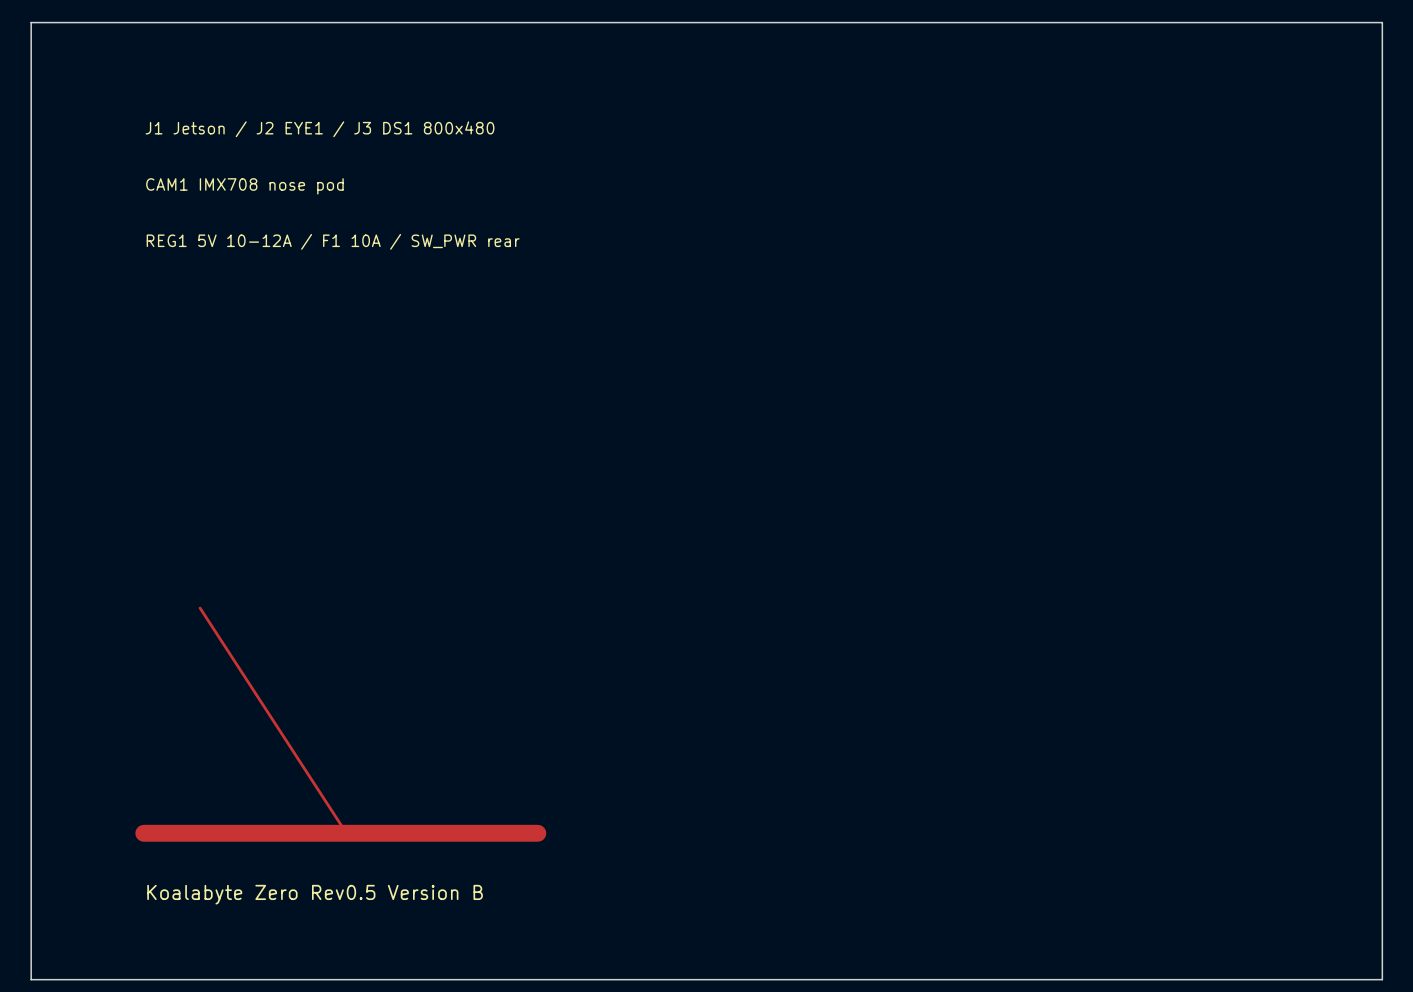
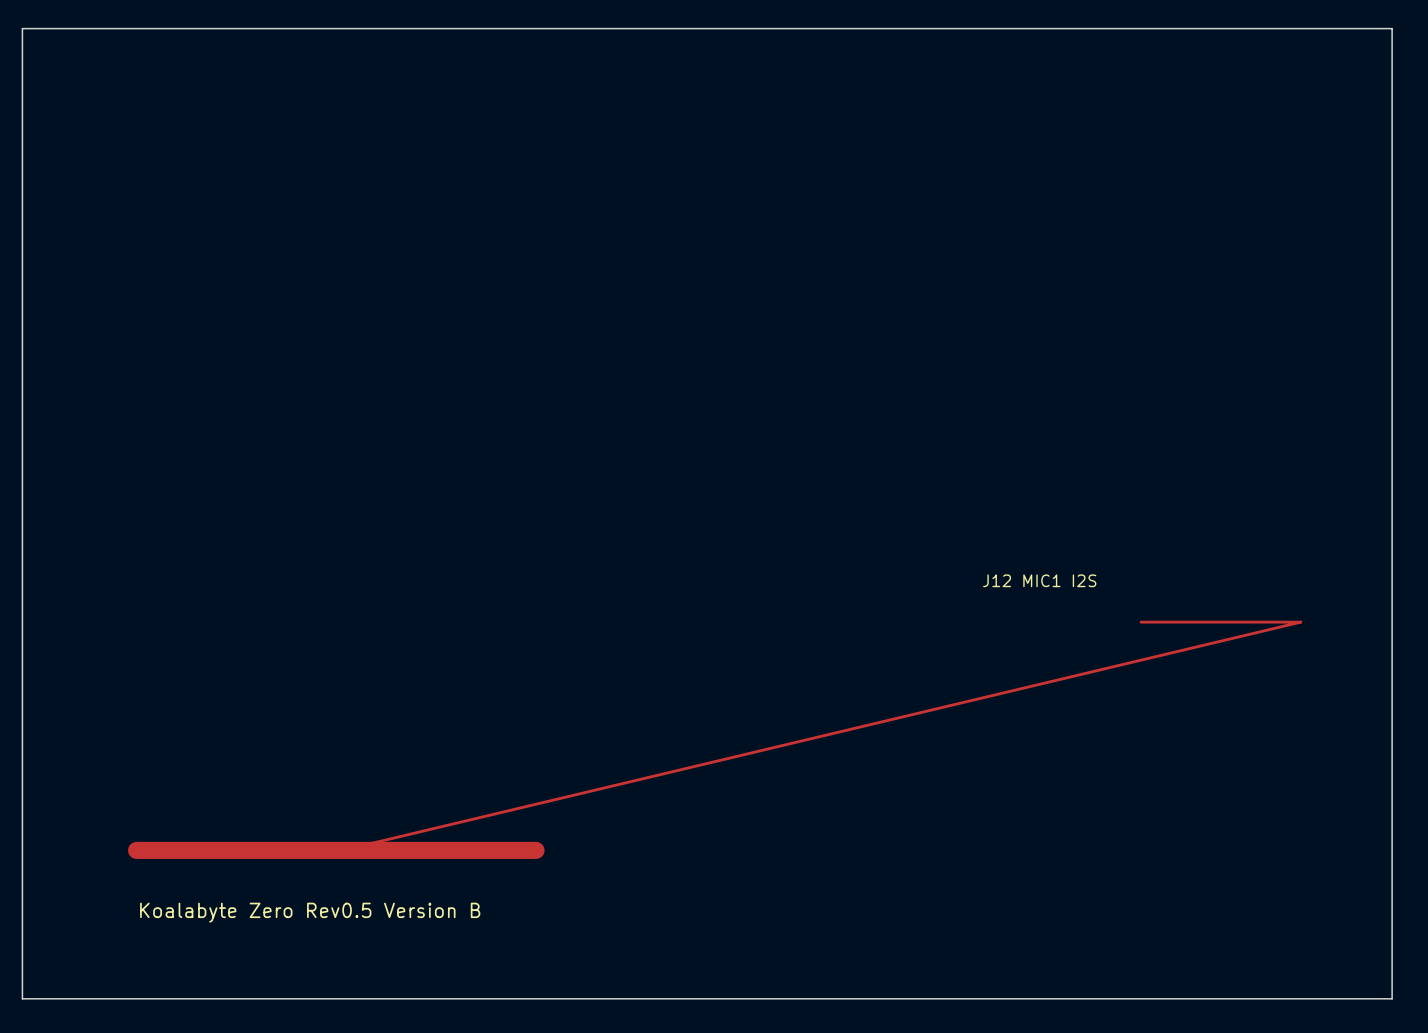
text: J1 Jetson / J2 EYE1 / J3 DS1 800x480 (320, 129) -> none
text: CAM1 IMX708 nose pod (244, 186) -> none
text: REG1 5V 10-12A / F1 10A / SW_PWR rear (333, 241) -> none
text: none -> J12 MIC1 I2S (1039, 580)
track: (200, 608) (346, 833) -> (1141, 622) (1300, 622) (342, 850)

